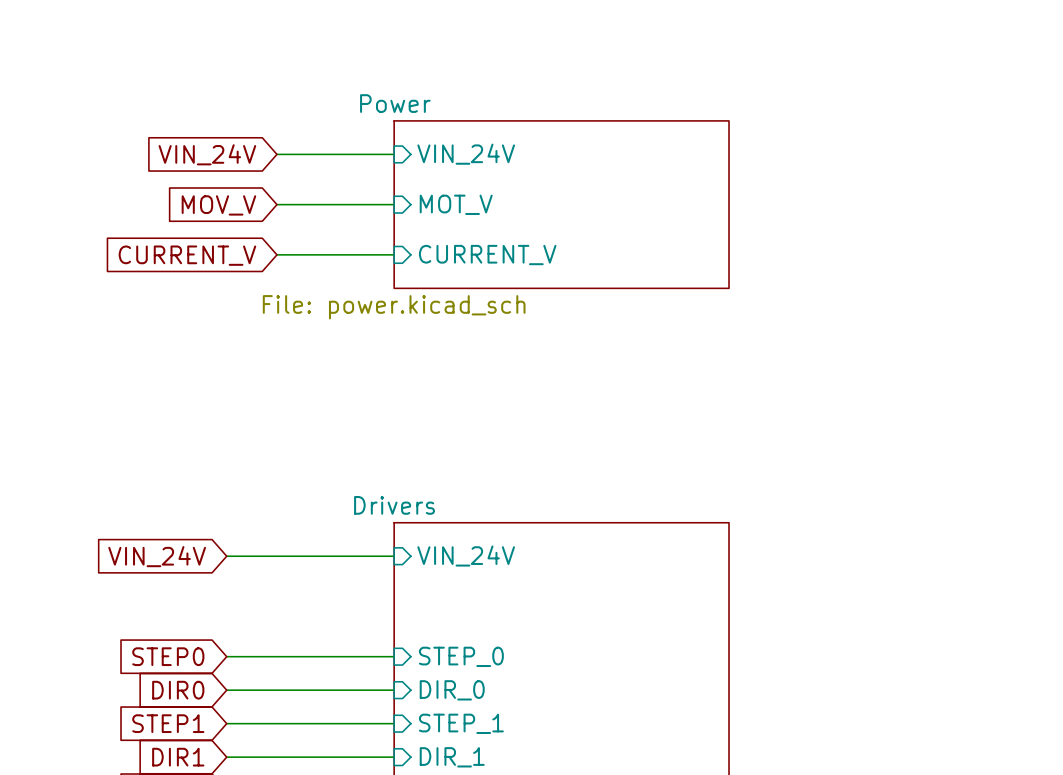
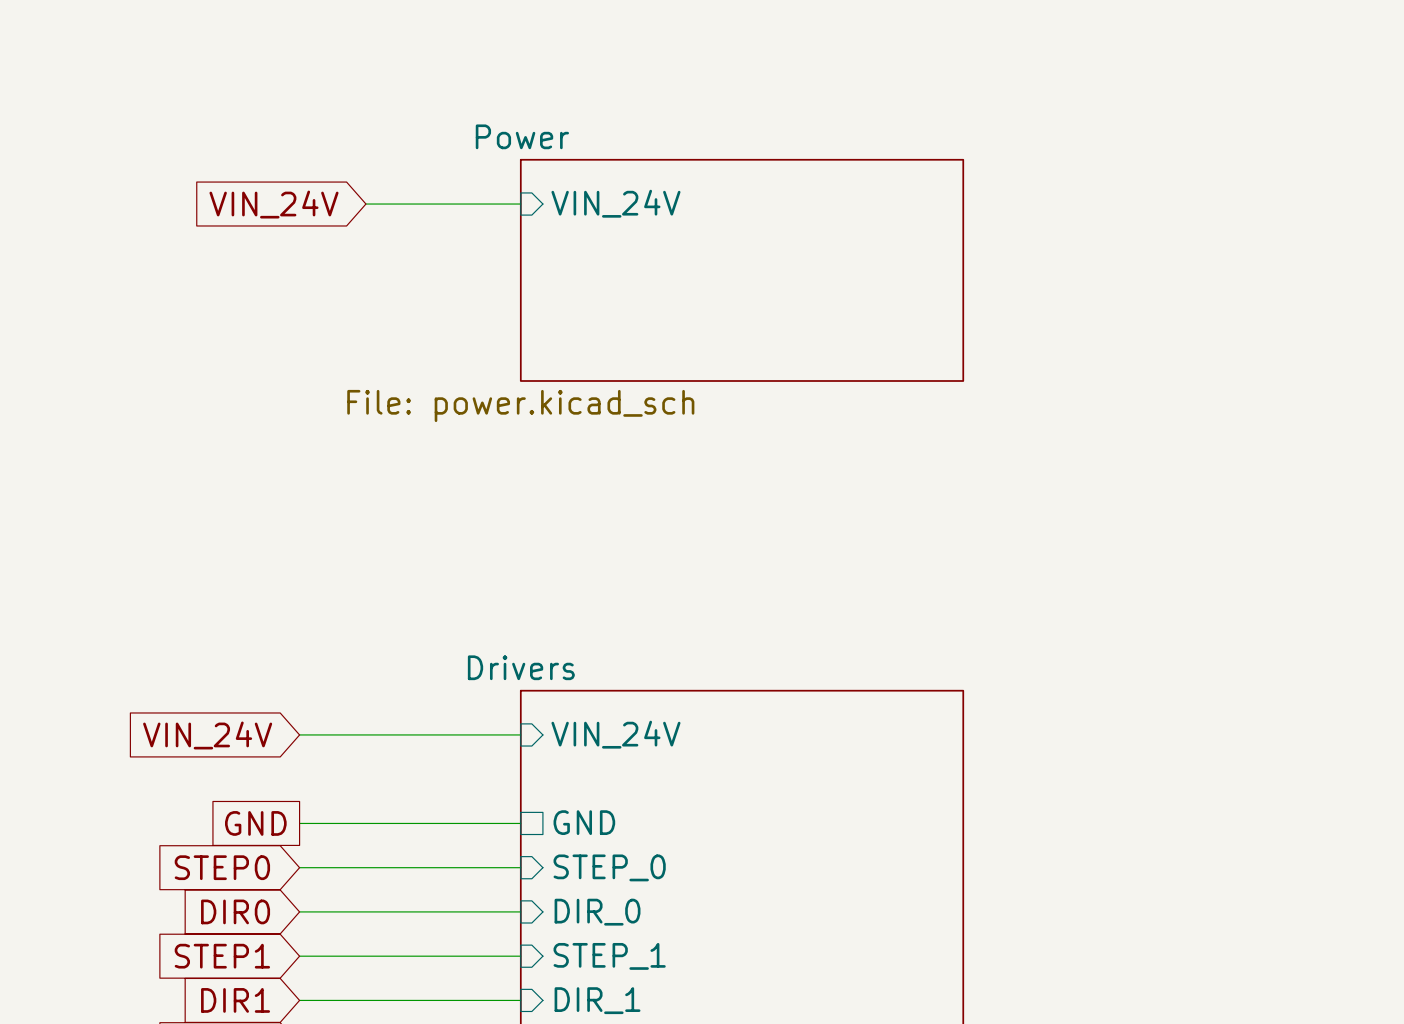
wire: (276, 204) (394, 204) -> none
sheet pin: MOT_V (456, 204) -> none
global label: MOV_V (218, 205) -> none
wire: (276, 254) (394, 254) -> none
global label: CURRENT_V (187, 255) -> none
sheet pin: CURRENT_V (487, 255) -> none
sheet pin: none -> GND (584, 822)
global label: none -> GND (255, 823)
wire: none -> (299, 823) (520, 823)

